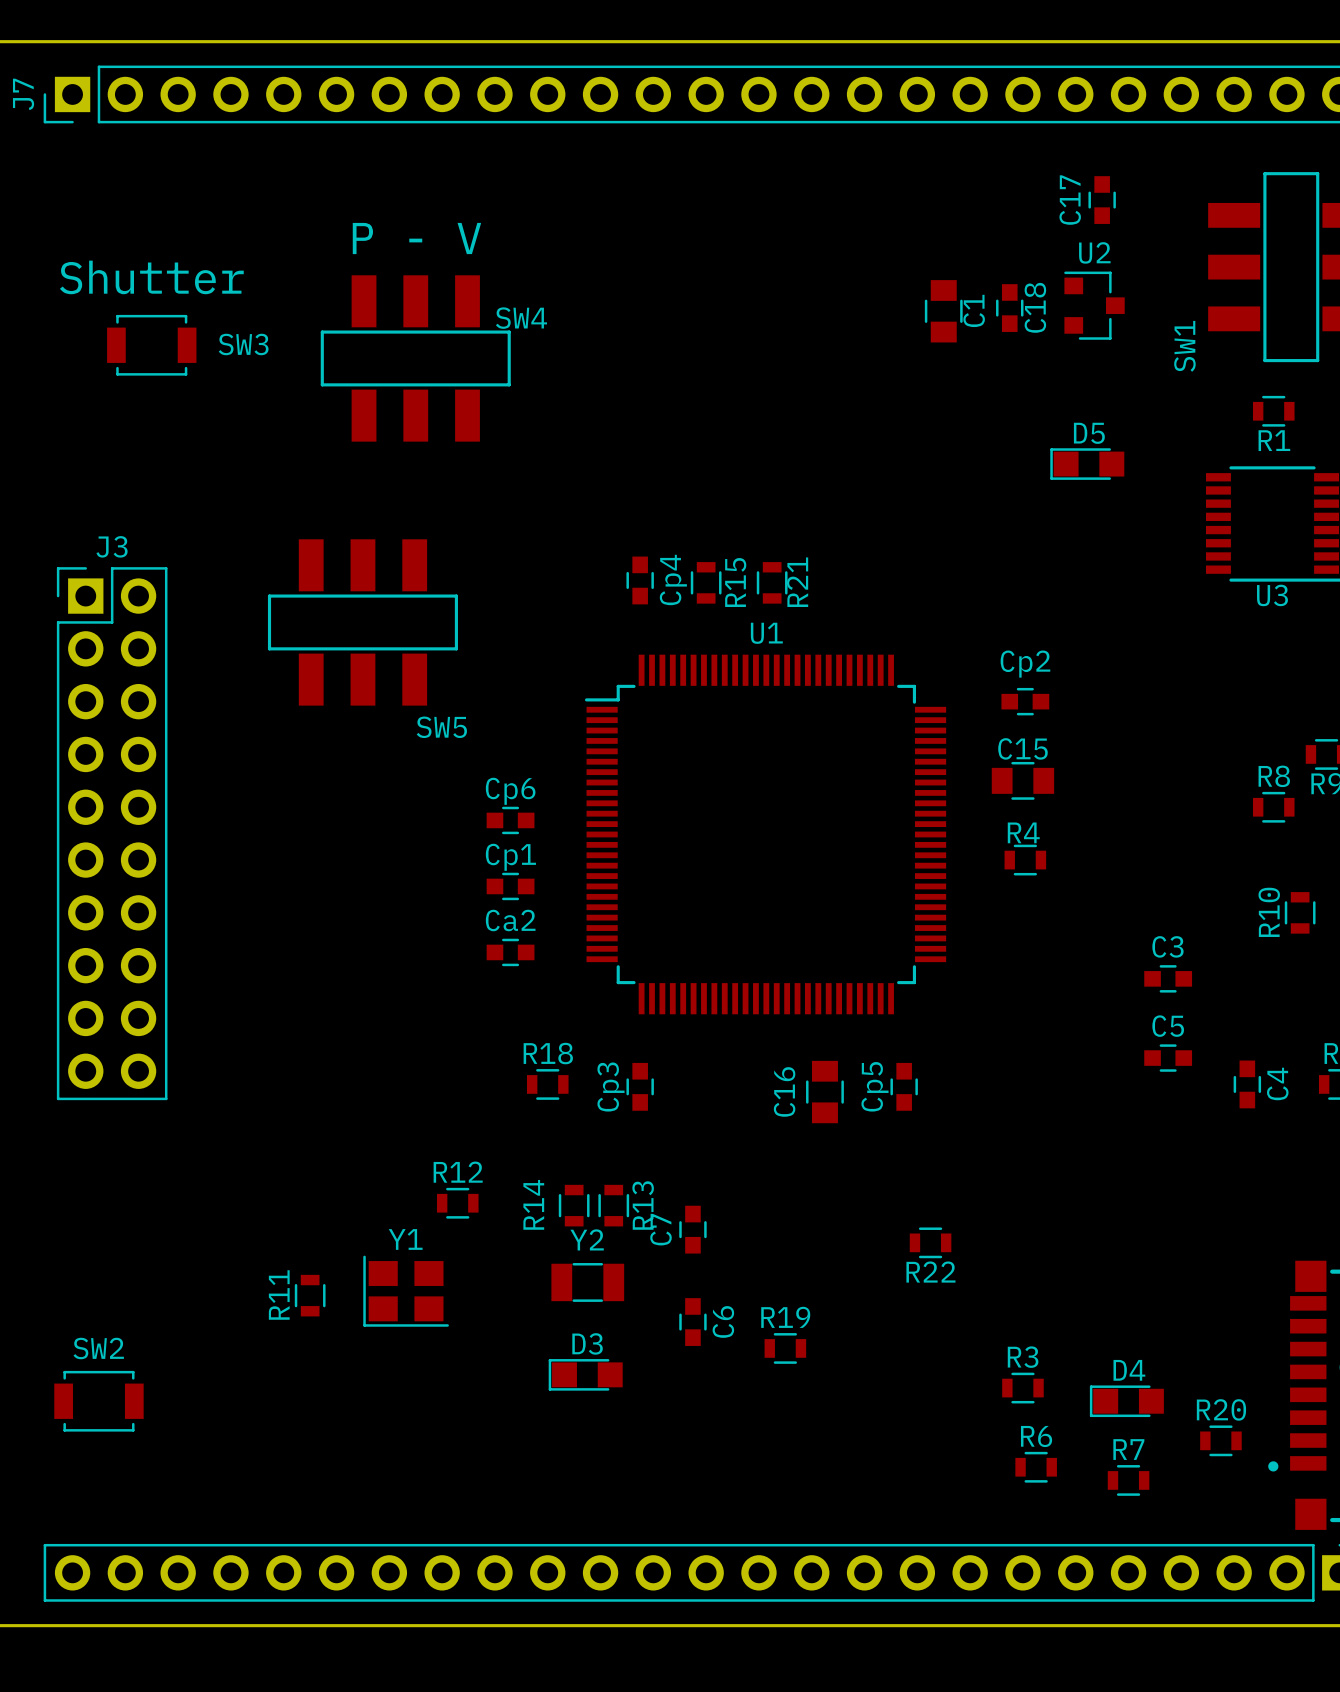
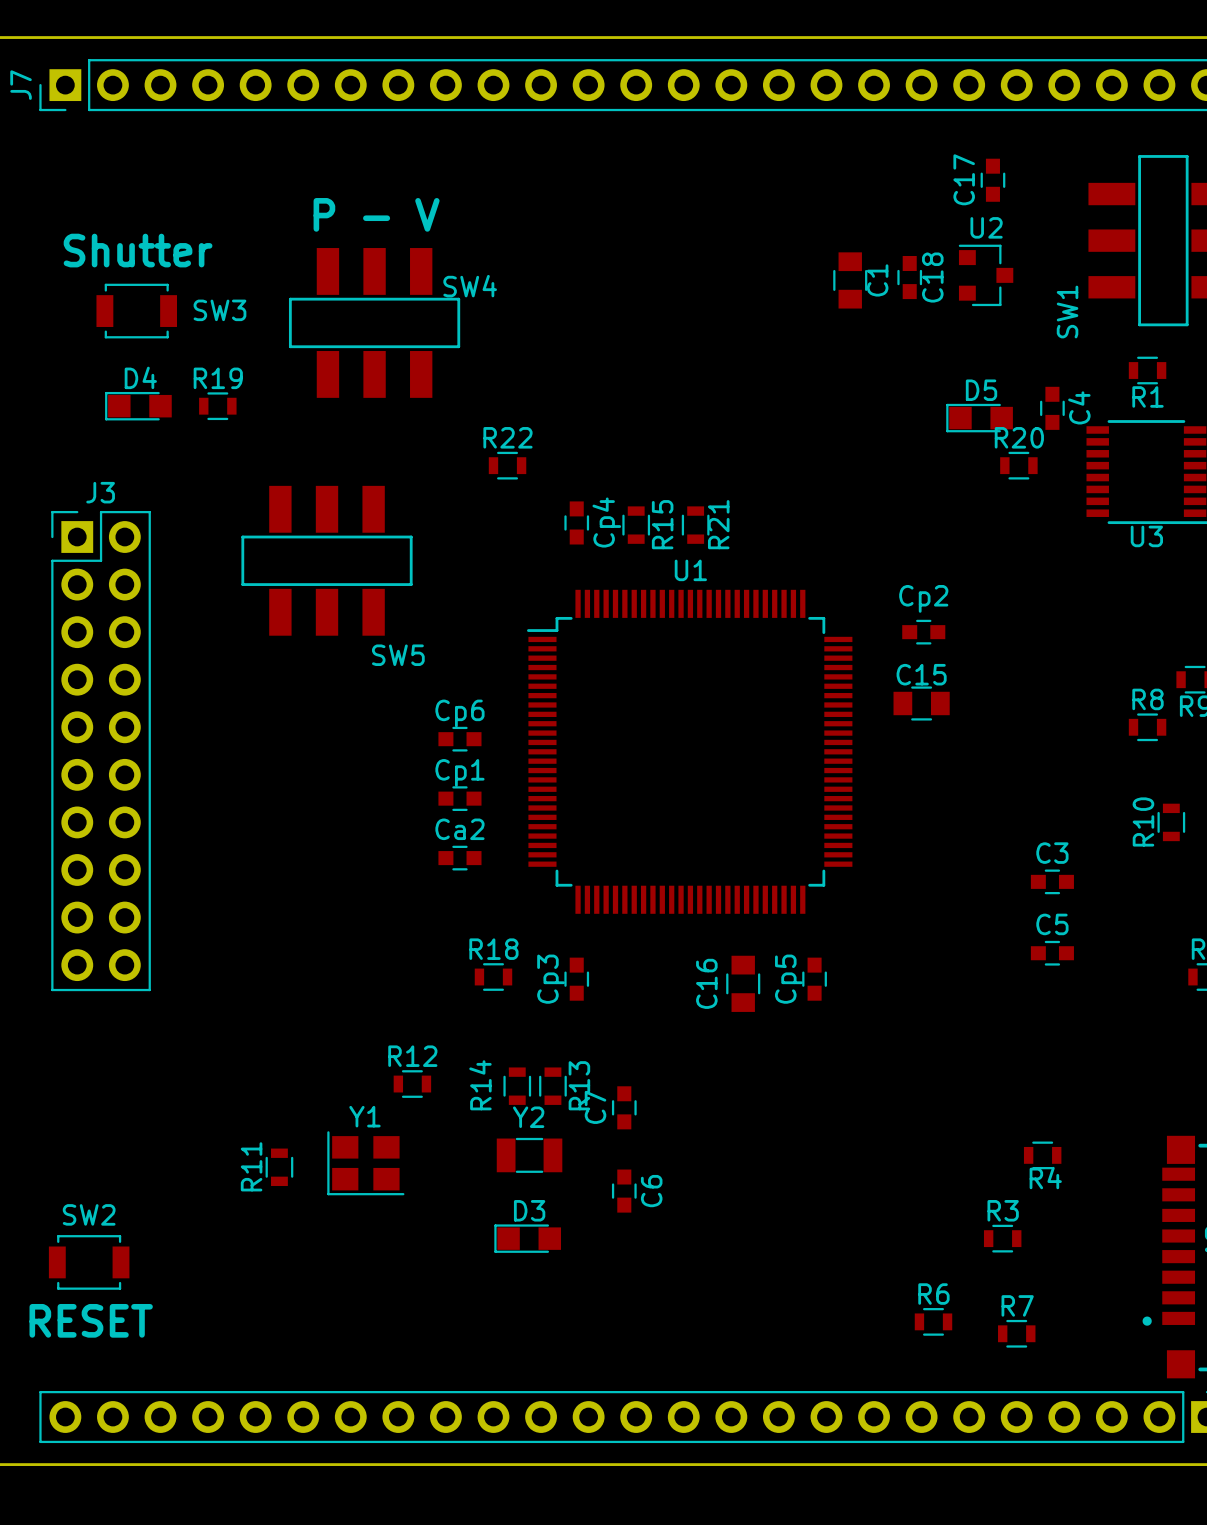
R4 name position: R4 (1023, 832) -> R4 (1045, 1178)
R4 position: (1025, 860) -> (1042, 1155)
C4 position: (1247, 1084) -> (1052, 408)
R22 position: (930, 1242) -> (507, 465)
R22 name position: R22 (930, 1272) -> R22 (507, 437)
R19 position: (785, 1348) -> (217, 406)
R3 position: (1022, 1388) -> (1002, 1238)
D4 position: (1126, 1401) -> (138, 406)
R20 position: (1220, 1440) -> (1018, 465)
text: none -> RESET (91, 1320)

